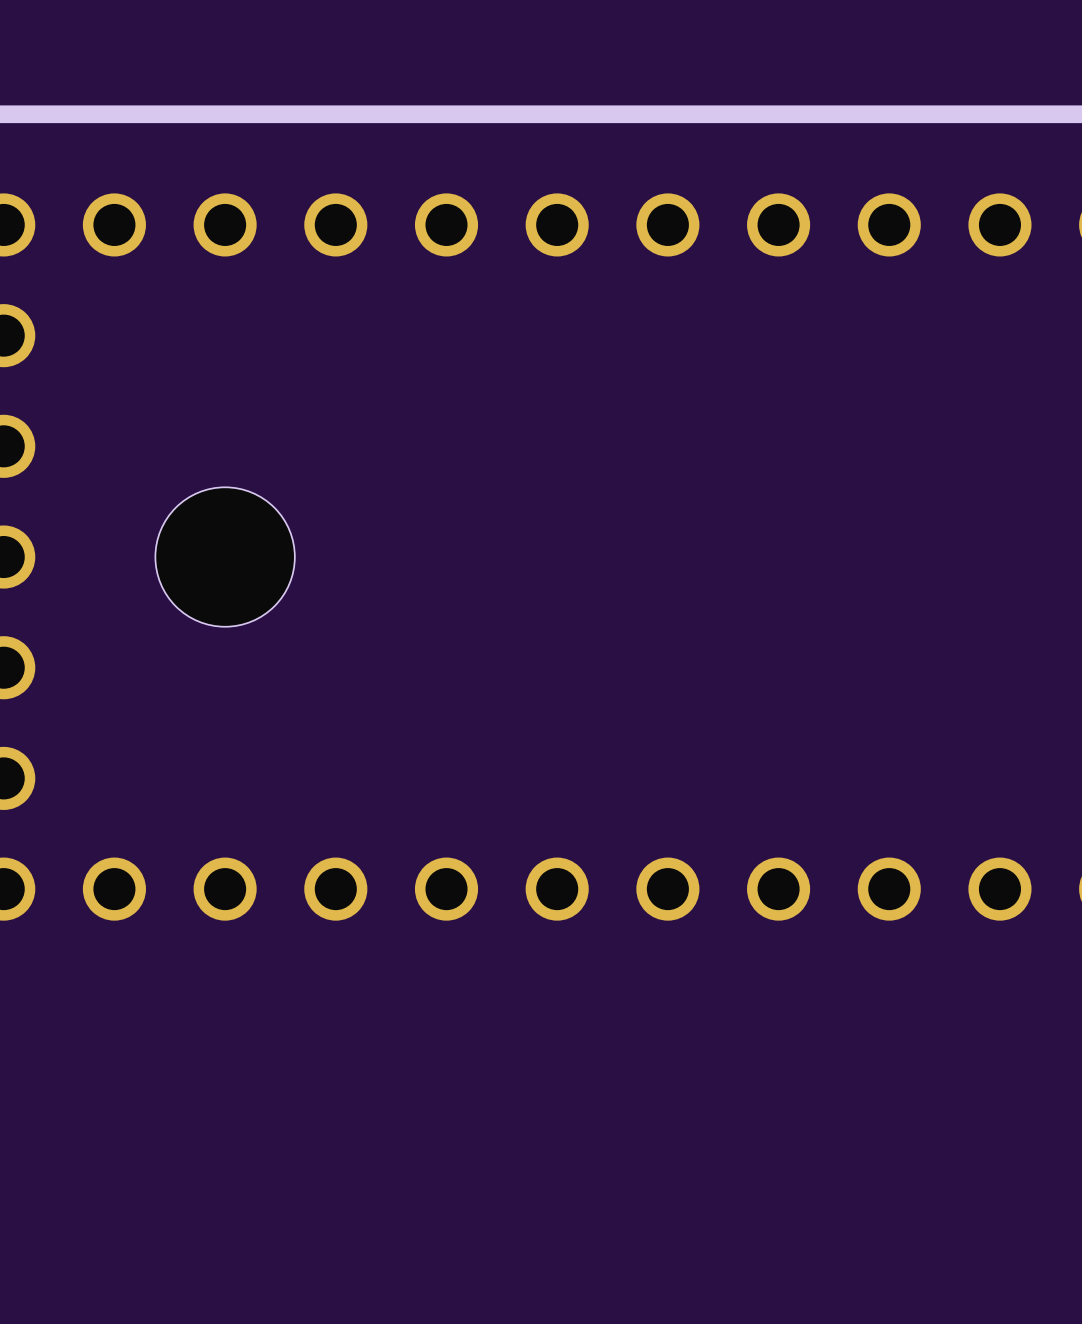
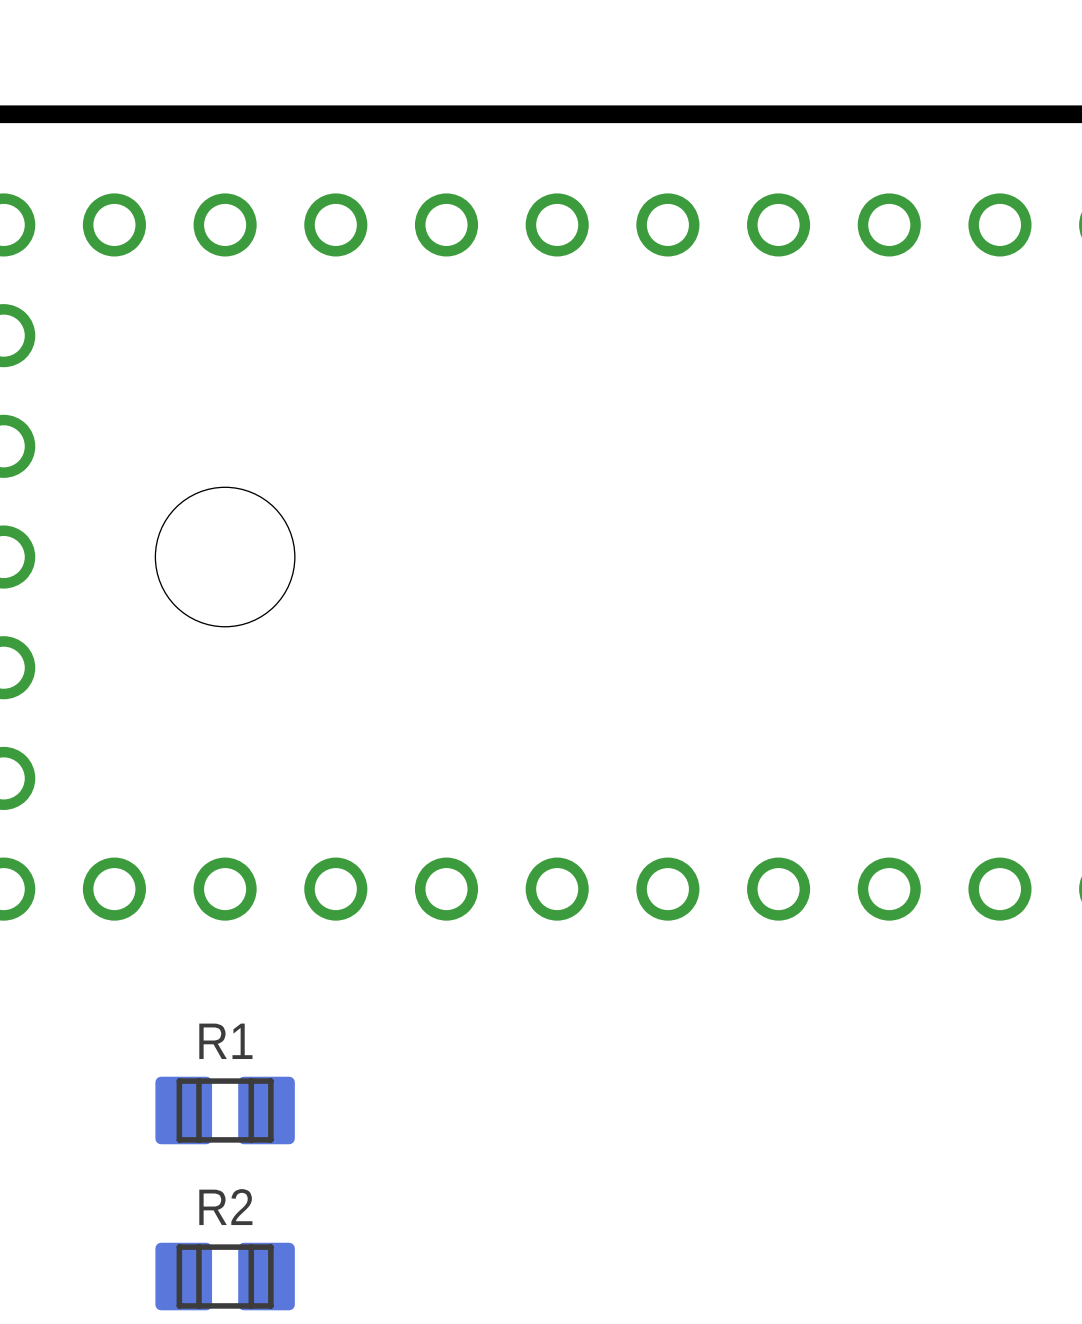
R1: none -> (225, 1110)
R2: none -> (225, 1276)

